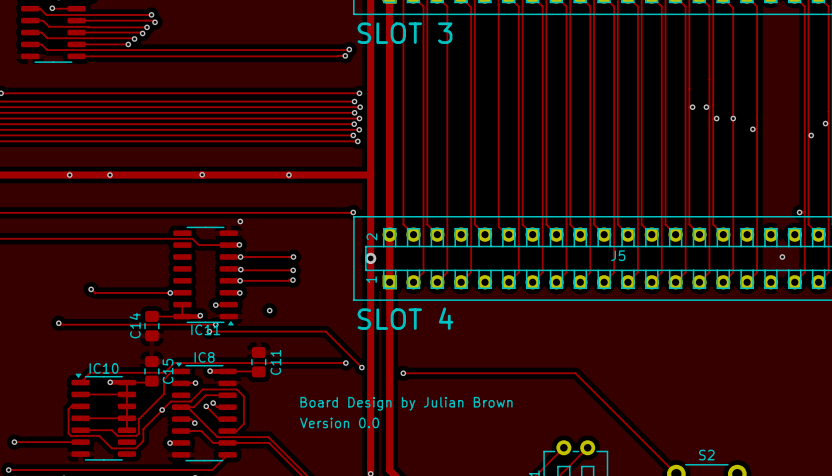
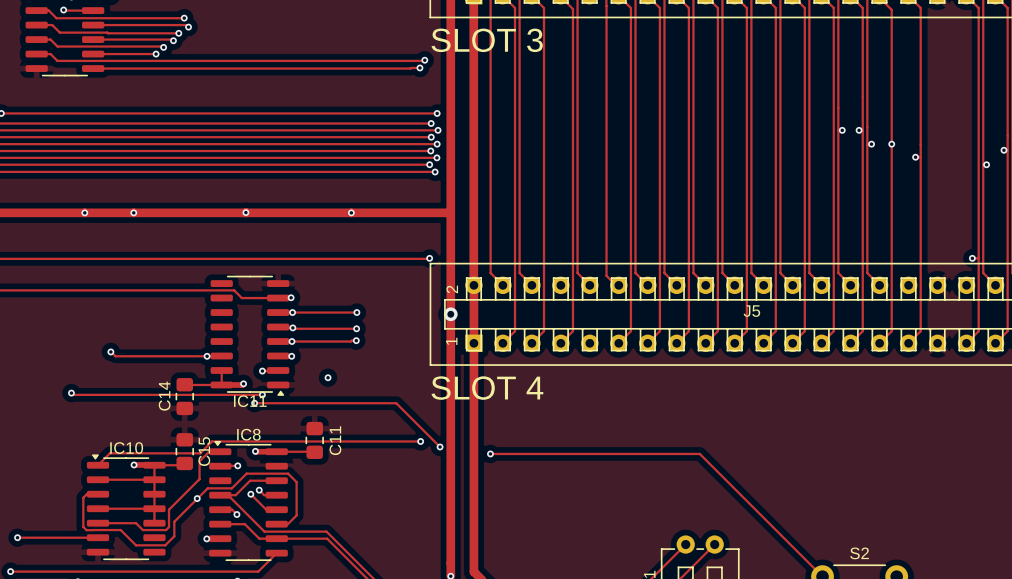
via: (240, 221) -> none
via: (782, 256) -> none
text: Board Design by Julian Brown (406, 403) -> none
text: Version 0.0 (339, 422) -> none

